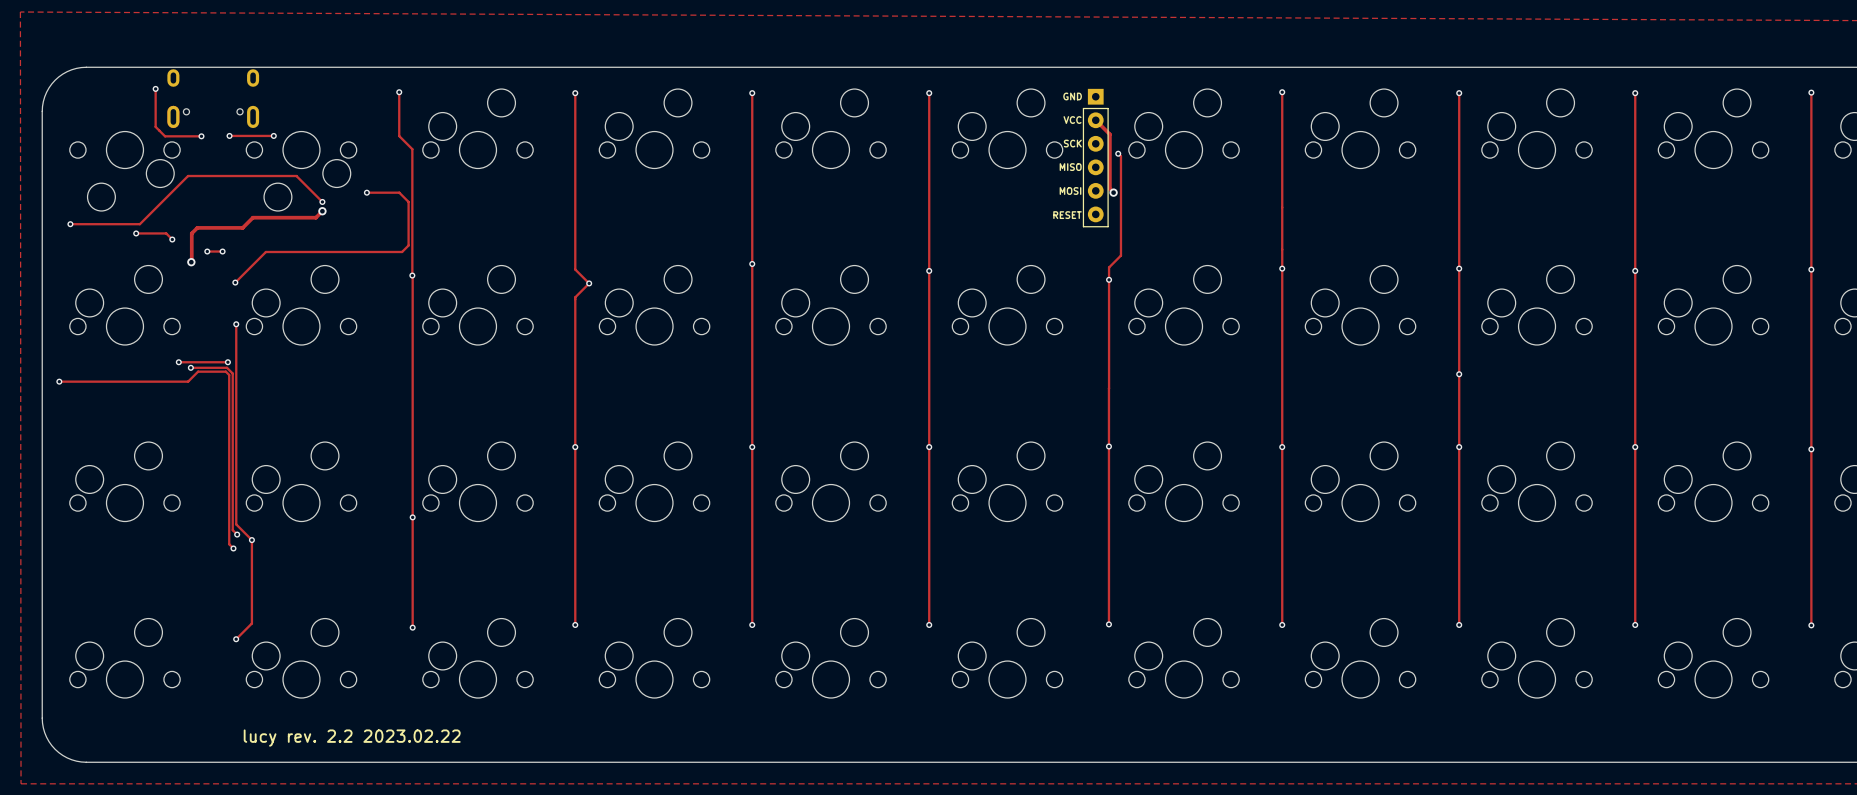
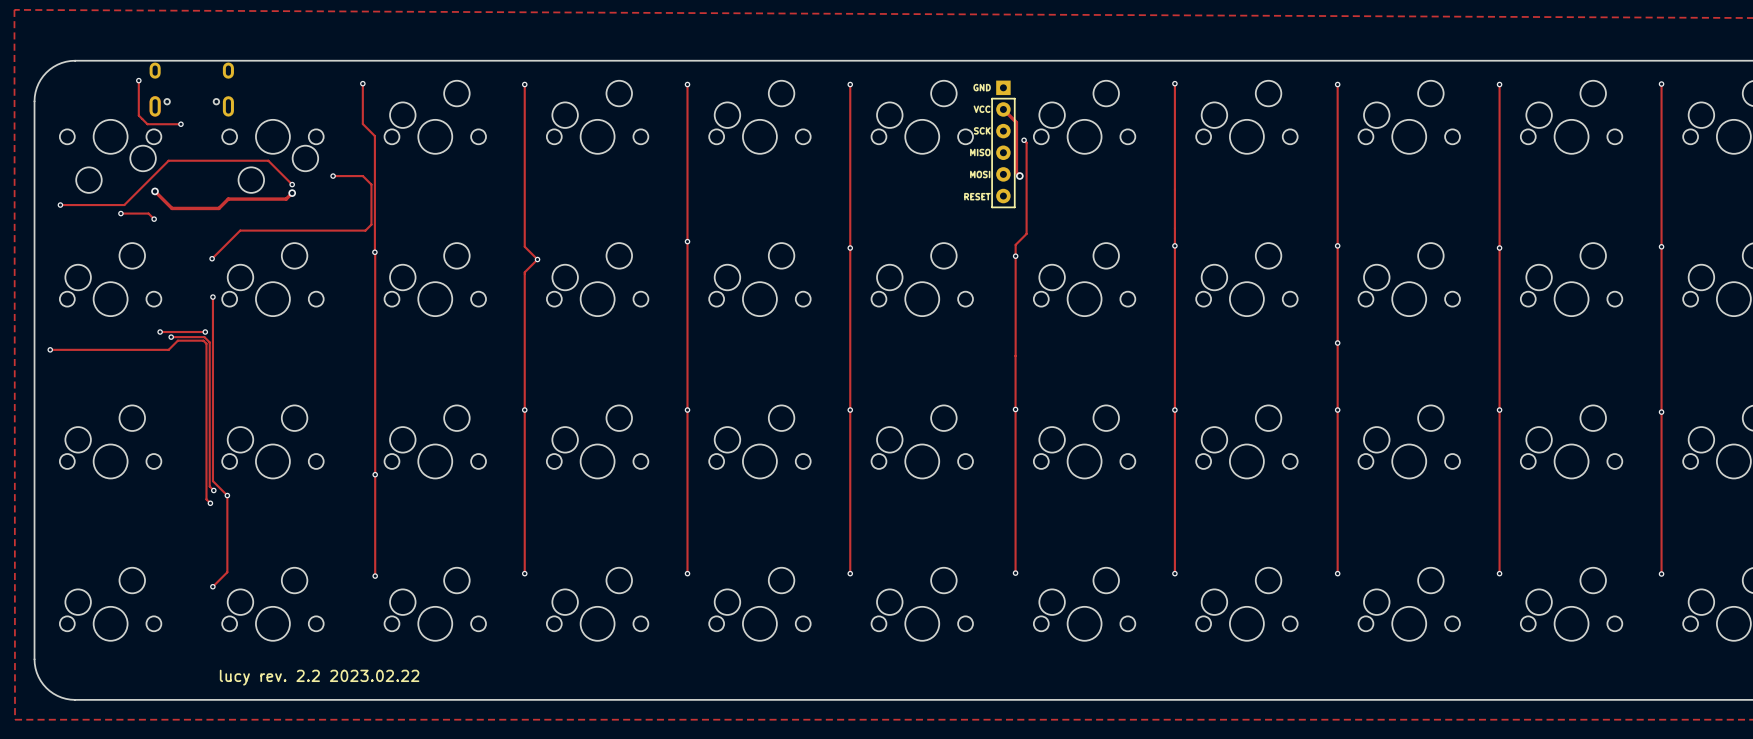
track: (229, 135) (273, 135) -> none
via: (229, 135) -> none
via: (273, 135) -> none
via: none -> (155, 191)
track: (197, 227) (191, 233) (191, 262) -> (177, 208) (172, 208) (155, 191)
track: (207, 251) (222, 251) -> none
via: (207, 251) -> none
via: (222, 251) -> none
via: (191, 262) -> none

